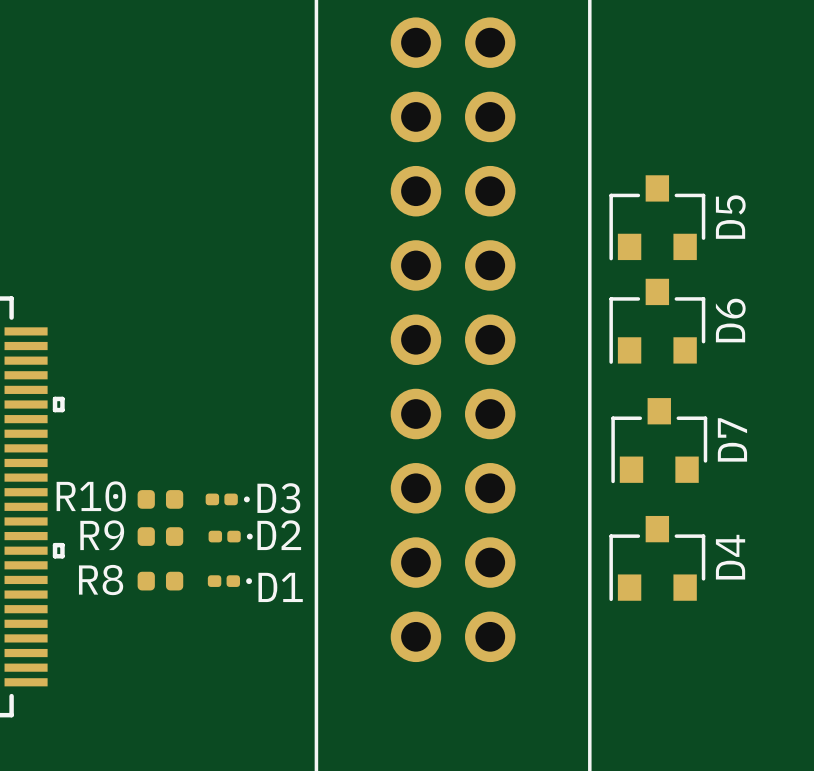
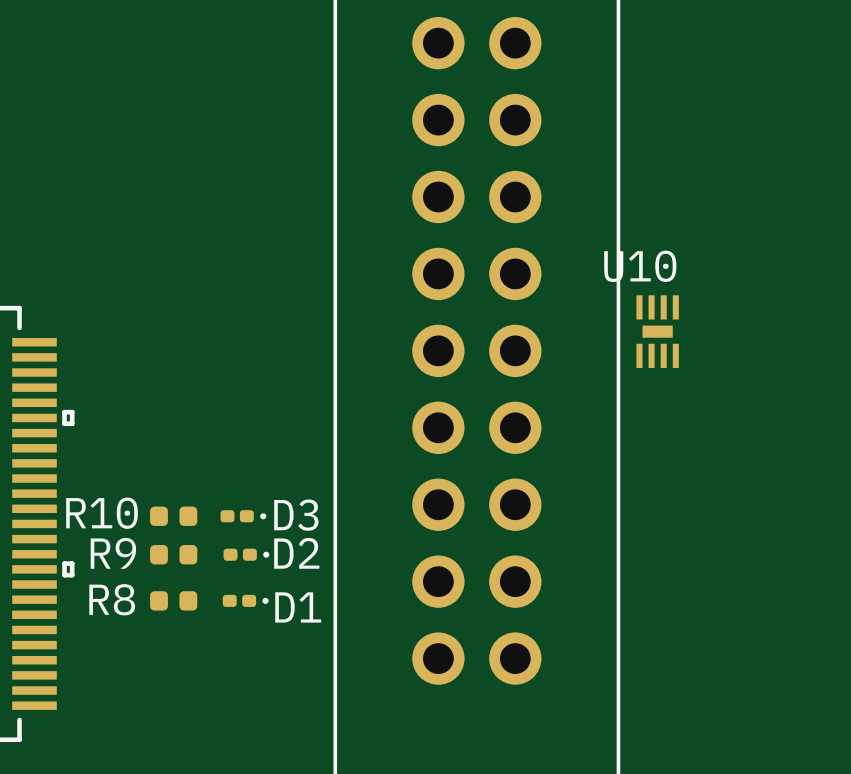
D5: (657, 217) -> none
U10: none -> (657, 331)
D6: (657, 321) -> none
D7: (659, 440) -> none
D4: (657, 558) -> none

